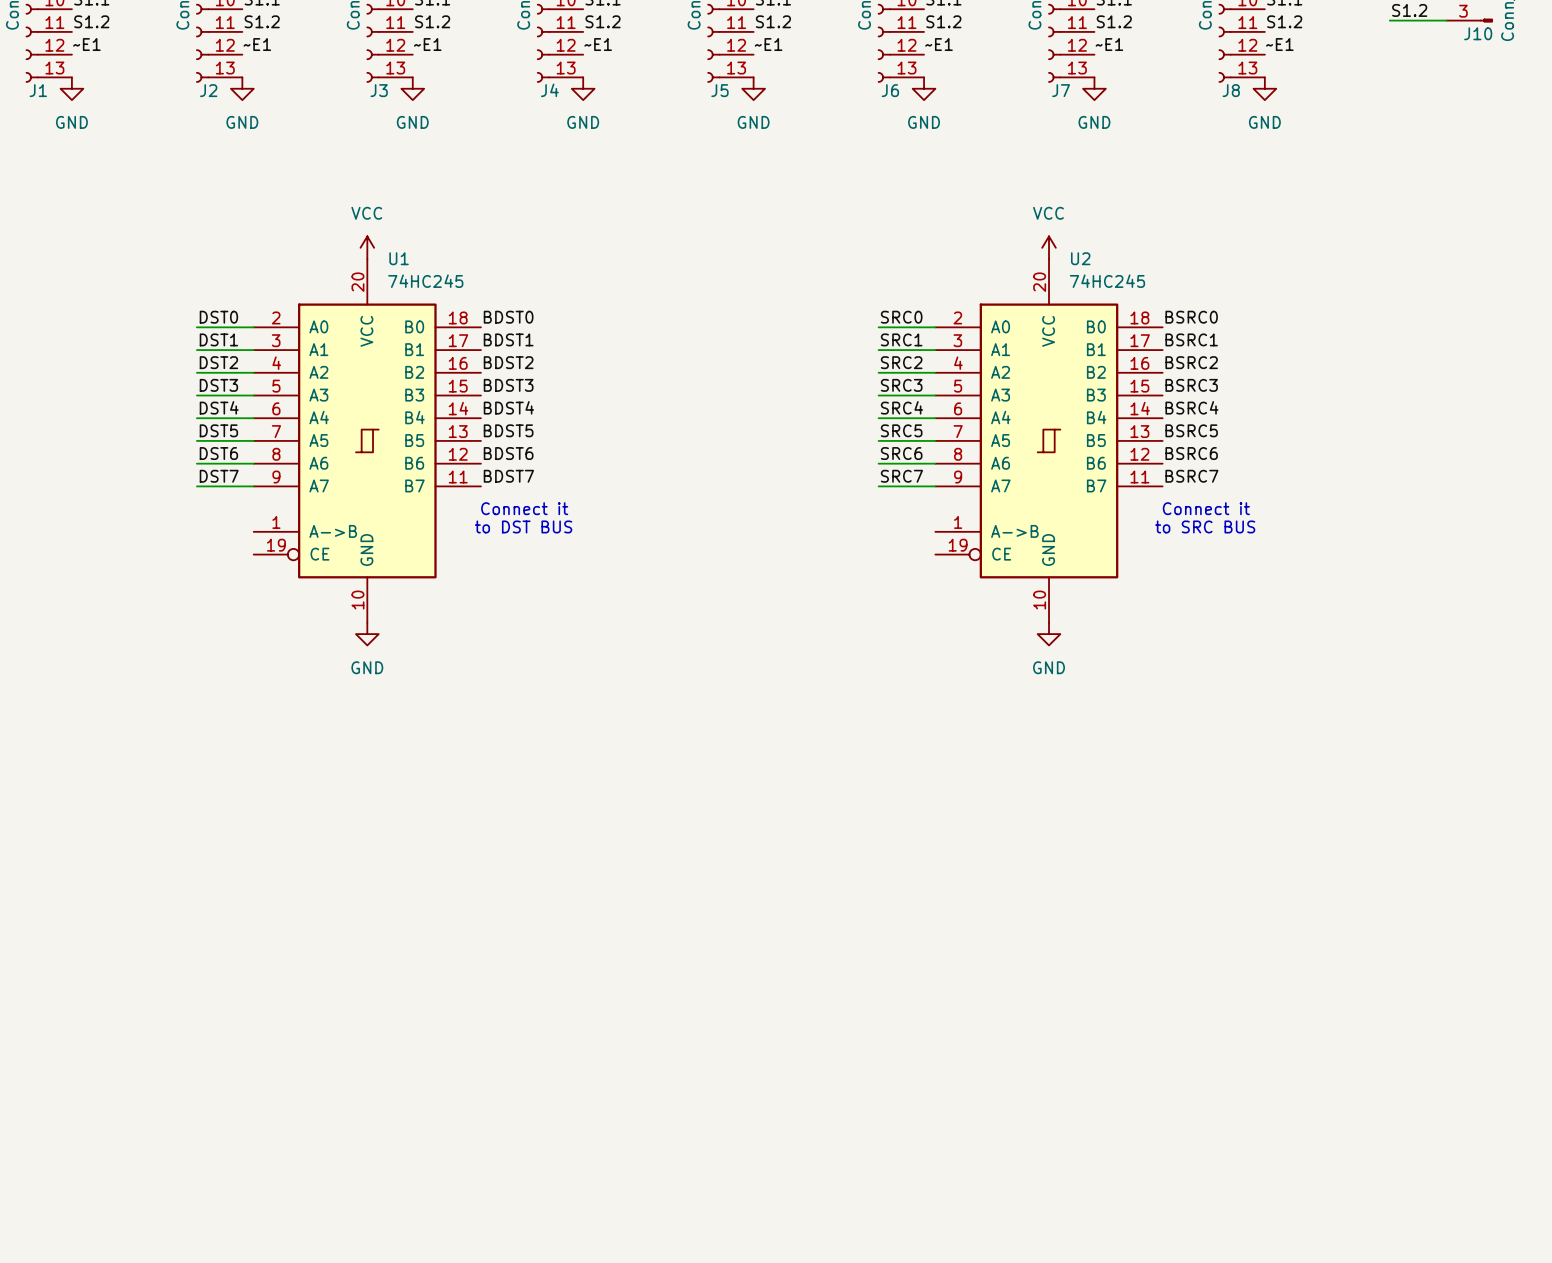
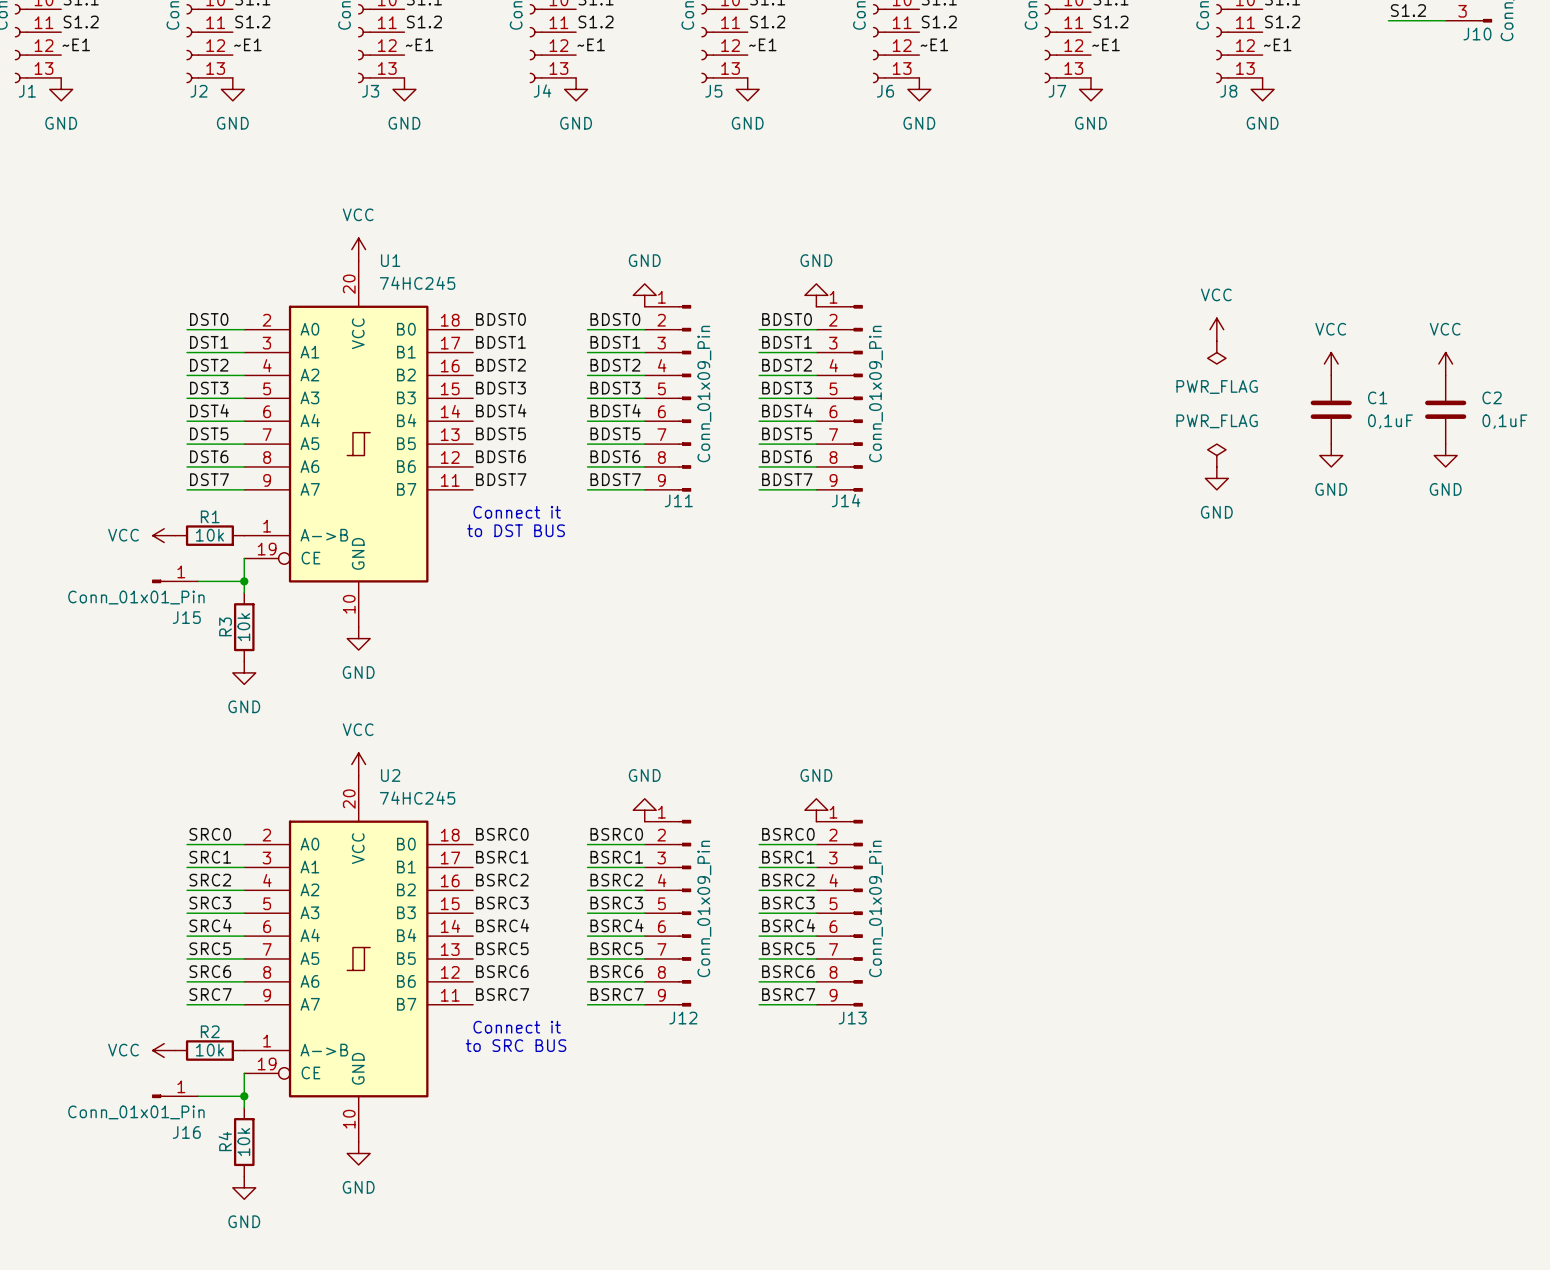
power symbol: VCC (1049, 247) -> none
power symbol: none -> GND (644, 295)
power symbol: none -> GND (816, 295)
label: none -> BDST0 (615, 319)
label: none -> BDST0 (787, 319)
label: SRC0 (901, 317) -> none
label: BSRC0 (1191, 317) -> none
wire: none -> (587, 329) (644, 329)
wire: (878, 327) (935, 327) -> (759, 329) (816, 329)
power symbol: none -> VCC (1216, 329)
label: none -> BDST1 (615, 342)
label: none -> BDST1 (787, 342)
label: SRC1 (901, 339) -> none
label: BSRC1 (1191, 339) -> none
wire: none -> (587, 352) (644, 352)
wire: (878, 350) (935, 350) -> (759, 352) (816, 352)
power symbol: none -> PWR_FLAG (1216, 352)
power symbol: none -> VCC (1331, 364)
power symbol: none -> VCC (1445, 364)
label: none -> BDST2 (615, 365)
label: none -> BDST2 (787, 365)
label: SRC2 (901, 362) -> none
label: BSRC2 (1191, 362) -> none
wire: none -> (587, 375) (644, 375)
wire: (878, 372) (935, 372) -> (759, 375) (816, 375)
label: none -> BDST3 (615, 388)
label: none -> BDST3 (787, 388)
label: SRC3 (901, 385) -> none
label: BSRC3 (1191, 385) -> none
wire: none -> (587, 398) (644, 398)
J11: none -> Conn_01x09_Pin (667, 398)
J14: none -> Conn_01x09_Pin (839, 398)
wire: (878, 395) (935, 395) -> (759, 398) (816, 398)
C1: none -> 0,1uF (1331, 409)
C2: none -> 0,1uF (1445, 409)
label: none -> BDST4 (615, 410)
label: none -> BDST4 (787, 410)
label: SRC4 (901, 407) -> none
label: BSRC4 (1191, 407) -> none
wire: none -> (587, 421) (644, 421)
wire: (878, 418) (935, 418) -> (759, 421) (816, 421)
label: none -> BDST5 (615, 433)
label: none -> BDST5 (787, 433)
label: SRC5 (901, 430) -> none
label: BSRC5 (1191, 430) -> none
wire: none -> (587, 444) (644, 444)
wire: (878, 440) (935, 440) -> (759, 444) (816, 444)
U2 position: (1049, 440) -> (358, 958)
power symbol: none -> PWR_FLAG (1216, 455)
power symbol: none -> GND (1331, 455)
power symbol: none -> GND (1445, 455)
label: none -> BDST6 (615, 456)
label: none -> BDST6 (787, 456)
label: SRC6 (901, 453) -> none
label: BSRC6 (1191, 453) -> none
wire: none -> (587, 466) (644, 466)
wire: (878, 463) (935, 463) -> (759, 466) (816, 466)
power symbol: none -> GND (1216, 478)
label: none -> BDST7 (615, 479)
label: none -> BDST7 (787, 479)
label: SRC7 (901, 476) -> none
label: BSRC7 (1191, 476) -> none
wire: none -> (587, 489) (644, 489)
wire: (878, 486) (935, 486) -> (759, 489) (816, 489)
text: Connect it (1206, 508) -> none
text: to SRC BUS (1205, 526) -> none
power symbol: none -> VCC (164, 535)
R1: none -> 10k (209, 535)
wire: none -> (244, 558) (244, 592)
J15: none -> Conn_01x01_Pin (175, 581)
wire: none -> (198, 581) (244, 581)
junction: none -> (244, 581)
R3: none -> 10k (244, 627)
power symbol: GND (1049, 634) -> none
power symbol: none -> GND (244, 672)
power symbol: none -> VCC (358, 764)
power symbol: none -> GND (644, 810)
power symbol: none -> GND (816, 810)
label: none -> SRC0 (210, 834)
label: none -> BSRC0 (502, 834)
label: none -> BSRC0 (616, 834)
label: none -> BSRC0 (788, 834)
wire: none -> (187, 844) (244, 844)
wire: none -> (587, 844) (644, 844)
wire: none -> (759, 844) (816, 844)
label: none -> SRC1 (210, 857)
label: none -> BSRC1 (502, 857)
label: none -> BSRC1 (616, 857)
label: none -> BSRC1 (788, 857)
wire: none -> (187, 867) (244, 867)
wire: none -> (587, 867) (644, 867)
wire: none -> (759, 867) (816, 867)
label: none -> SRC2 (210, 880)
label: none -> BSRC2 (502, 880)
label: none -> BSRC2 (616, 880)
label: none -> BSRC2 (788, 880)
wire: none -> (187, 890) (244, 890)
wire: none -> (587, 890) (644, 890)
wire: none -> (759, 890) (816, 890)
label: none -> SRC3 (210, 903)
label: none -> BSRC3 (502, 903)
label: none -> BSRC3 (616, 903)
label: none -> BSRC3 (788, 903)
wire: none -> (187, 913) (244, 913)
wire: none -> (587, 913) (644, 913)
J12: none -> Conn_01x09_Pin (667, 913)
wire: none -> (759, 913) (816, 913)
J13: none -> Conn_01x09_Pin (839, 913)
label: none -> SRC4 (210, 925)
label: none -> BSRC4 (502, 925)
label: none -> BSRC4 (617, 925)
label: none -> BSRC4 (788, 925)
wire: none -> (187, 936) (244, 936)
wire: none -> (587, 936) (644, 936)
wire: none -> (759, 936) (816, 936)
label: none -> SRC5 (210, 948)
label: none -> BSRC5 (502, 948)
label: none -> BSRC5 (616, 948)
label: none -> BSRC5 (788, 948)
wire: none -> (187, 958) (244, 958)
wire: none -> (587, 958) (644, 958)
wire: none -> (759, 958) (816, 958)
label: none -> SRC6 (210, 971)
label: none -> BSRC6 (502, 971)
label: none -> BSRC6 (616, 971)
label: none -> BSRC6 (788, 971)
wire: none -> (187, 981) (244, 981)
wire: none -> (587, 981) (644, 981)
wire: none -> (759, 981) (816, 981)
label: none -> SRC7 (210, 994)
label: none -> BSRC7 (502, 994)
label: none -> BSRC7 (617, 994)
label: none -> BSRC7 (788, 994)
wire: none -> (187, 1004) (244, 1004)
wire: none -> (587, 1004) (644, 1004)
wire: none -> (759, 1004) (816, 1004)
text: none -> Connect it (517, 1027)
text: none -> to SRC BUS (516, 1045)
power symbol: none -> VCC (164, 1050)
R2: none -> 10k (209, 1050)
wire: none -> (244, 1073) (244, 1107)
J16: none -> Conn_01x01_Pin (175, 1096)
wire: none -> (198, 1096) (244, 1096)
junction: none -> (244, 1096)
R4: none -> 10k (244, 1142)
power symbol: none -> GND (358, 1153)
power symbol: none -> GND (244, 1187)

